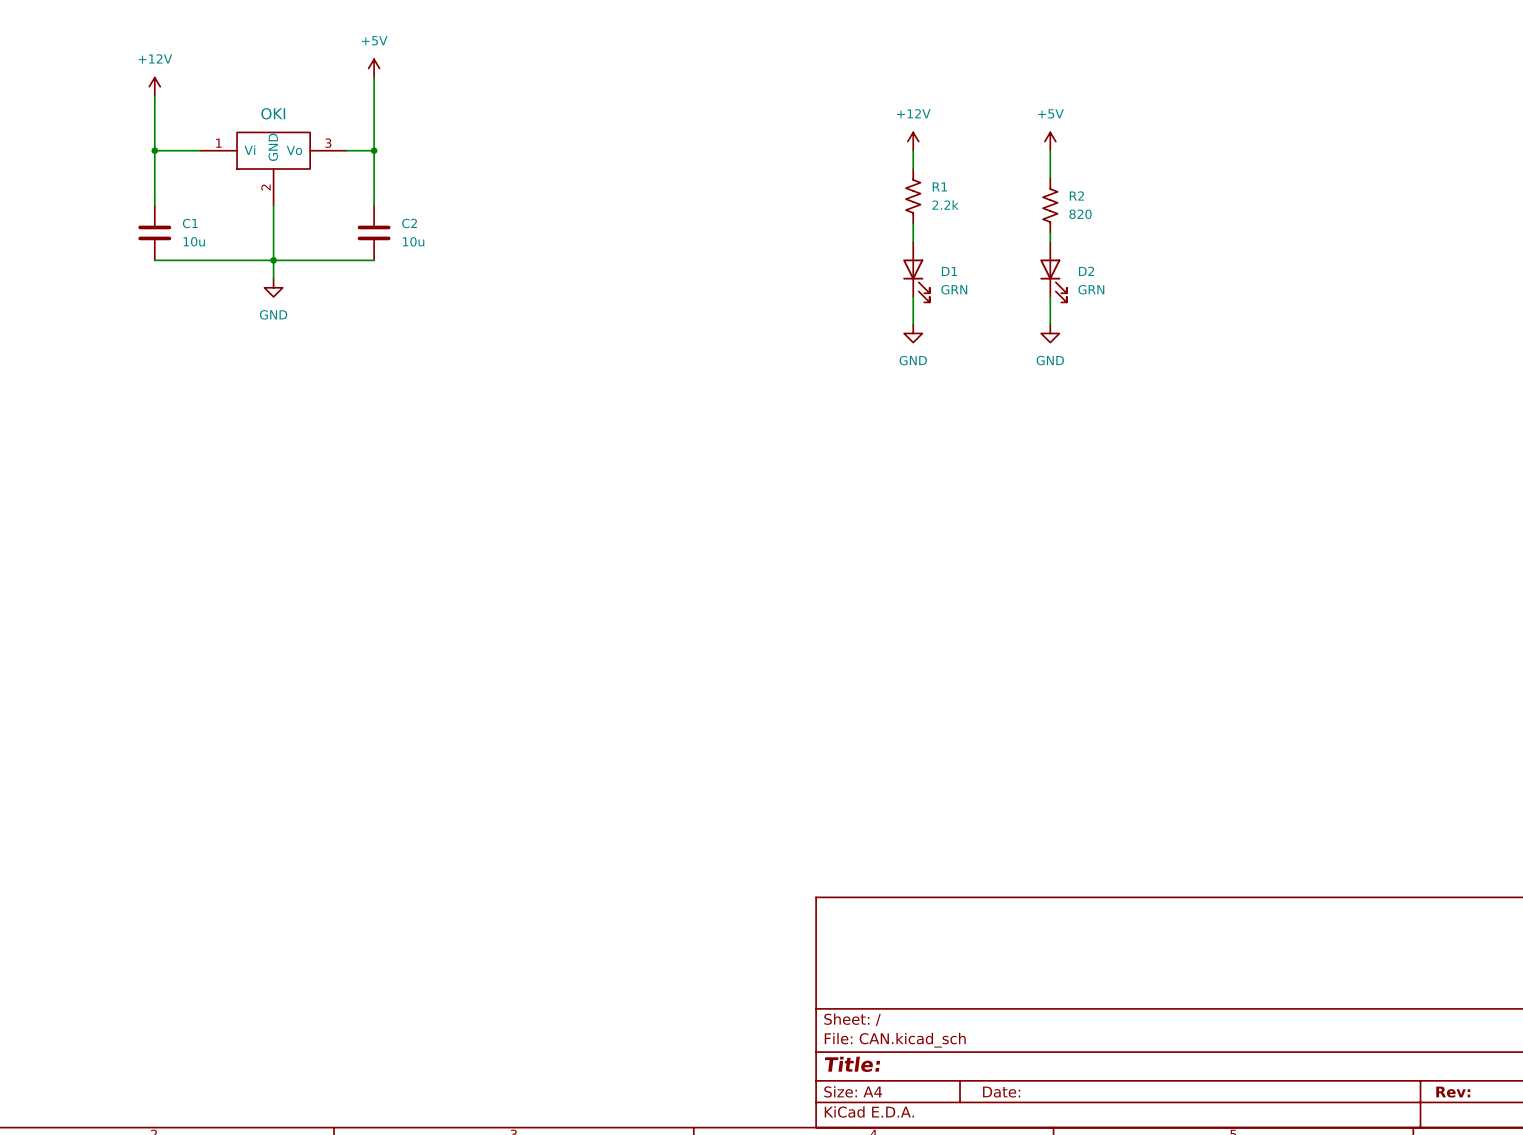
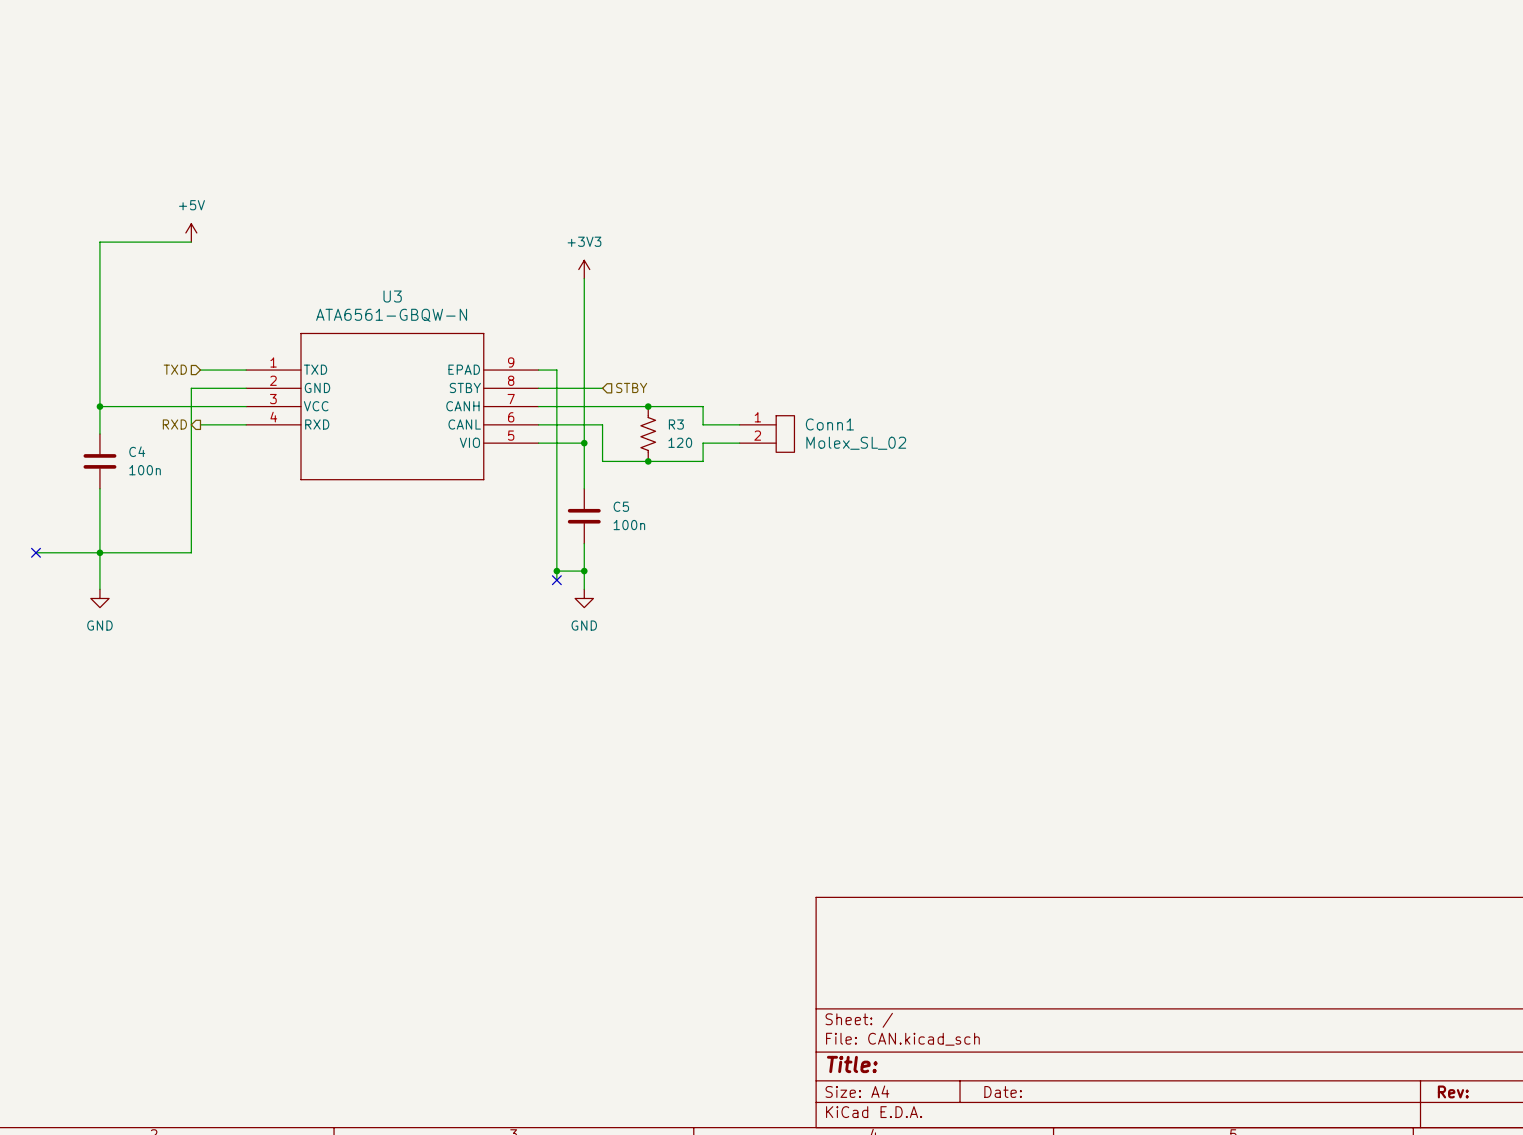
power symbol: +5V (374, 68) -> none
wire: (374, 77) (374, 205) -> none
power symbol: +12V (154, 86) -> none
wire: (154, 95) (154, 205) -> none
power symbol: +12V (913, 141) -> none
power symbol: +5V (1050, 141) -> none
wire: (154, 150) (200, 150) -> none
junction: (154, 150) -> none
wire: (346, 150) (374, 150) -> none
junction: (374, 150) -> none
wire: (913, 150) (913, 168) -> none
wire: (1050, 150) (1050, 178) -> none
part: OKI (273, 168) -> none
R1: 2.2k (913, 196) -> none
wire: (273, 205) (273, 278) -> none
R2: 820 (1050, 205) -> none
wire: (913, 223) (913, 242) -> none
C1: 10u (154, 232) -> none
power symbol: none -> +5V (191, 232)
C2: 10u (374, 232) -> none
wire: (1050, 232) (1050, 242) -> none
wire: none -> (191, 242) (99, 242) (99, 434)
wire: (154, 260) (374, 260) -> none
junction: (273, 260) -> none
power symbol: none -> +3V3 (584, 269)
D1: GRN (916, 272) -> none
D2: GRN (1053, 272) -> none
wire: none -> (584, 278) (584, 488)
power symbol: GND (273, 287) -> none
wire: (913, 296) (913, 324) -> none
wire: (1050, 296) (1050, 324) -> none
power symbol: GND (913, 333) -> none
power symbol: GND (1050, 333) -> none
hierarchical label: none -> TXD (175, 369)
wire: none -> (200, 370) (246, 370)
wire: none -> (538, 370) (556, 370) (556, 580)
hierarchical label: none -> STBY (631, 387)
wire: none -> (246, 388) (191, 388) (191, 552) (35, 552)
wire: none -> (538, 388) (602, 388)
wire: none -> (99, 406) (246, 406)
junction: none -> (99, 406)
U3: none -> ATA6561-GBQW-N (392, 406)
wire: none -> (538, 406) (703, 406) (703, 424) (739, 424)
junction: none -> (648, 406)
hierarchical label: none -> RXD (174, 424)
wire: none -> (200, 424) (246, 424)
wire: none -> (538, 424) (602, 424) (602, 461) (703, 461) (703, 443) (739, 443)
R3: none -> 120 (648, 434)
Conn1: none -> Molex_SL_02 (767, 434)
wire: none -> (538, 443) (584, 443)
junction: none -> (584, 443)
C4: none -> 100n (99, 461)
junction: none -> (648, 461)
wire: none -> (99, 488) (99, 589)
C5: none -> 100n (584, 516)
wire: none -> (584, 543) (584, 589)
no-connect mark: none -> (35, 552)
junction: none -> (99, 552)
wire: none -> (556, 571) (584, 571)
junction: none -> (556, 571)
junction: none -> (584, 571)
no-connect mark: none -> (556, 580)
power symbol: none -> GND (99, 598)
power symbol: none -> GND (584, 598)

